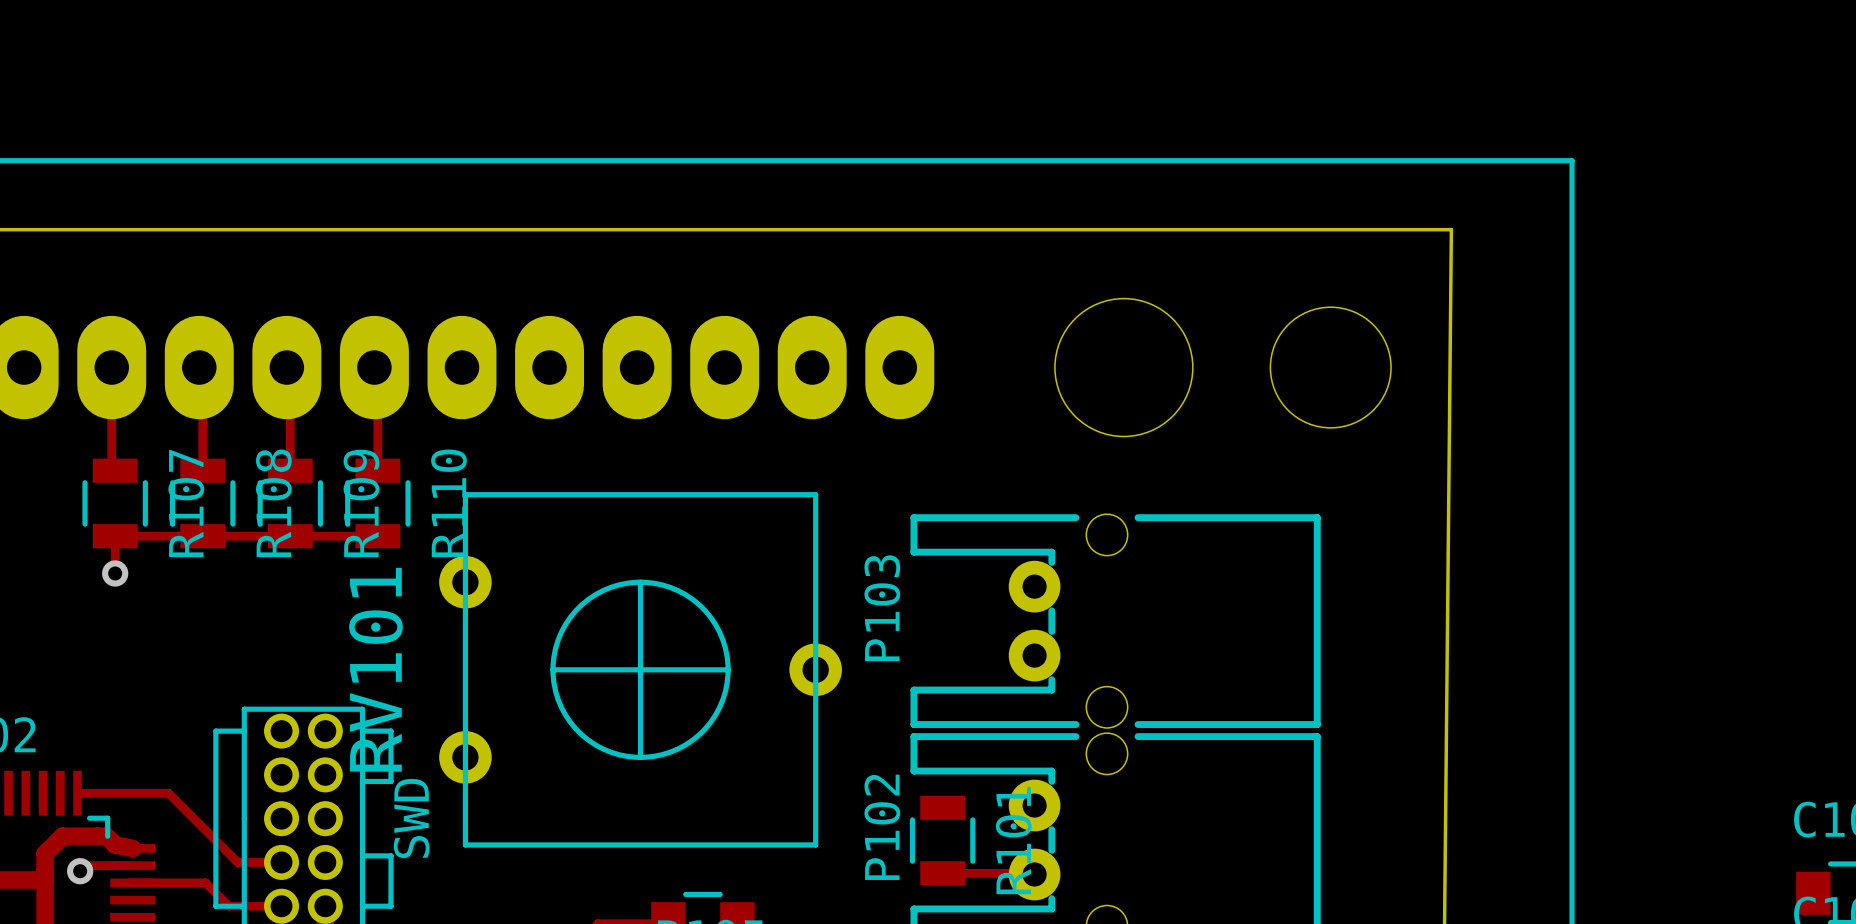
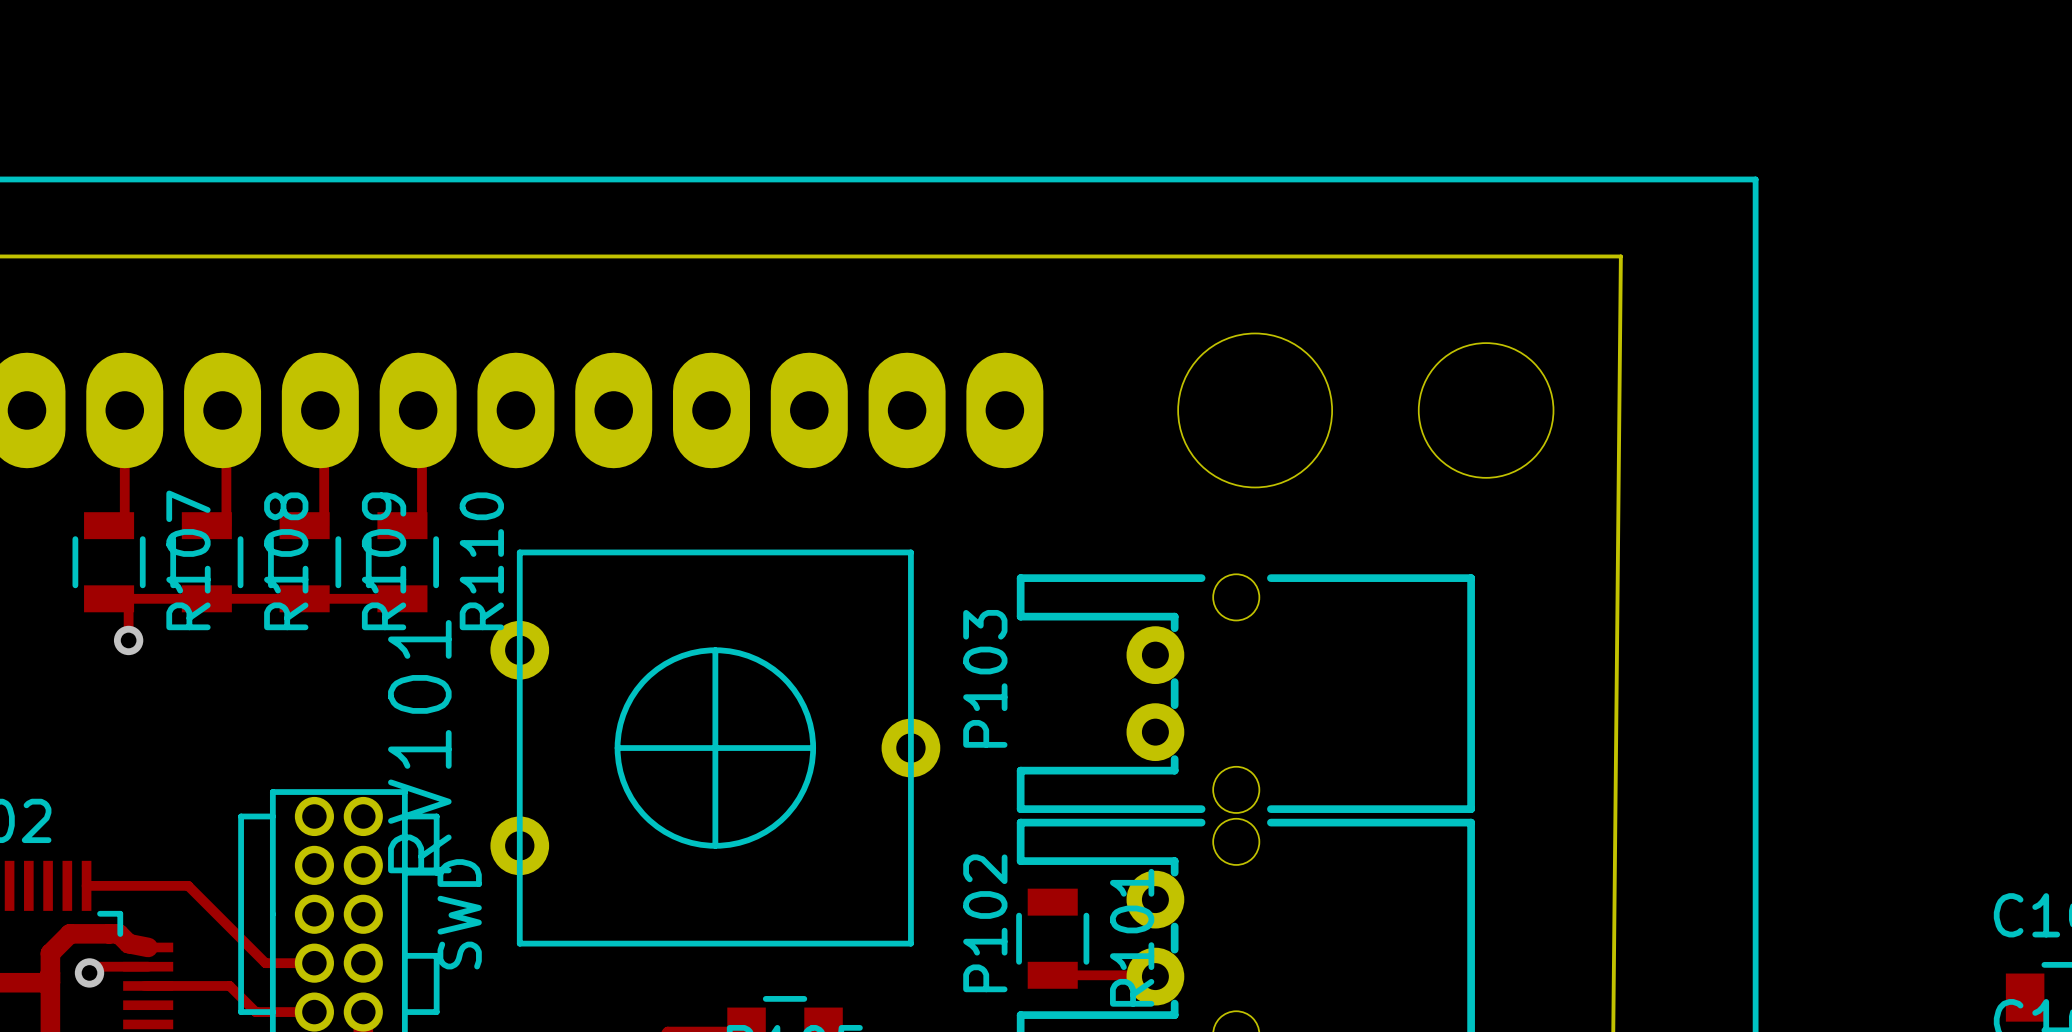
R107 position: (115, 503) -> (109, 562)
R108 position: (202, 503) -> (206, 562)
R109 position: (290, 503) -> (304, 562)
R110 position: (377, 503) -> (402, 562)

